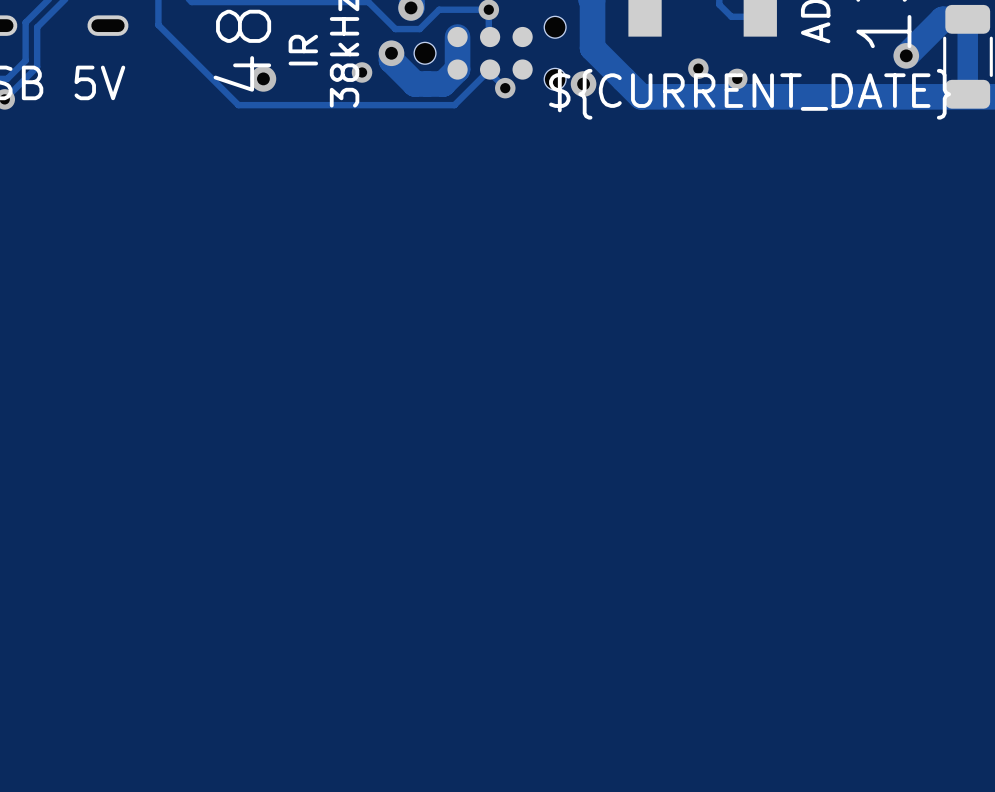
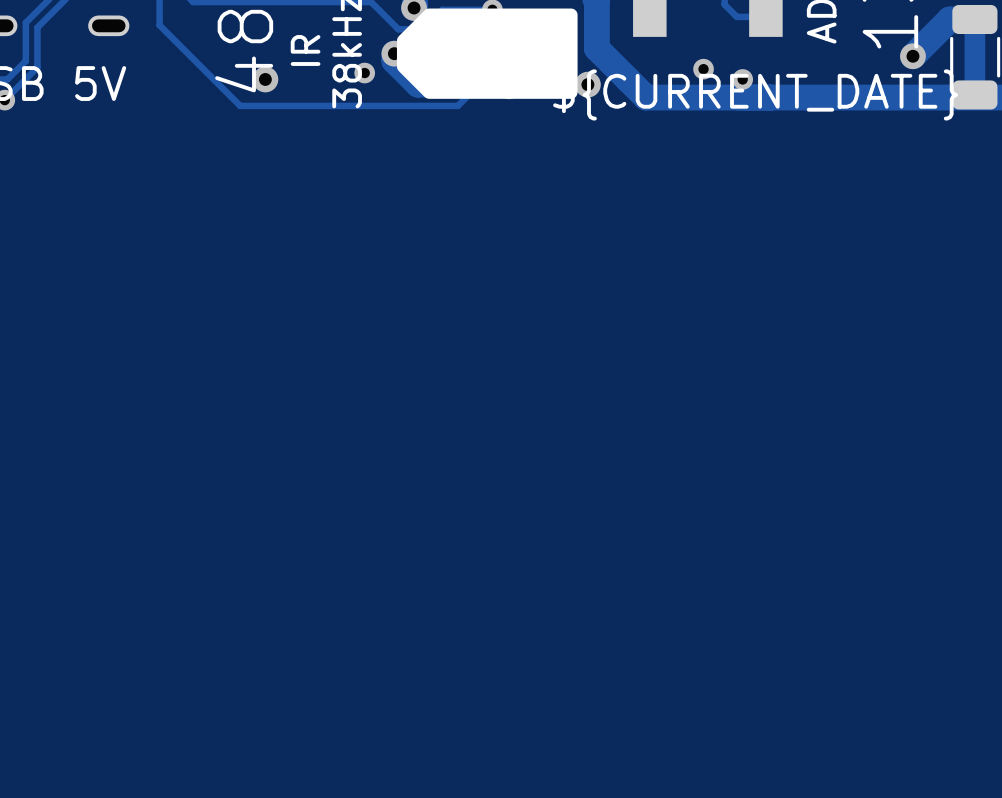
part footprint: [414, 16, 567, 91] -> [396, 8, 578, 99]

